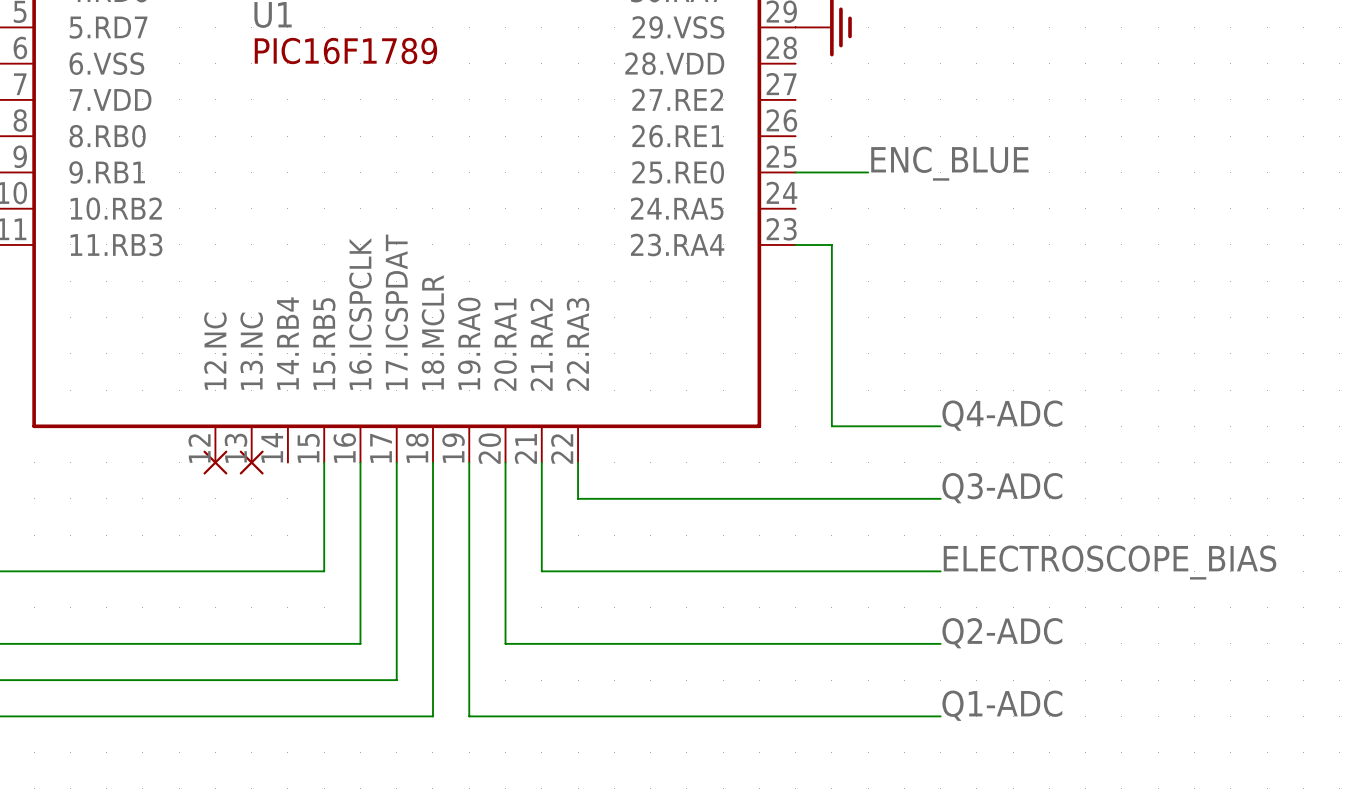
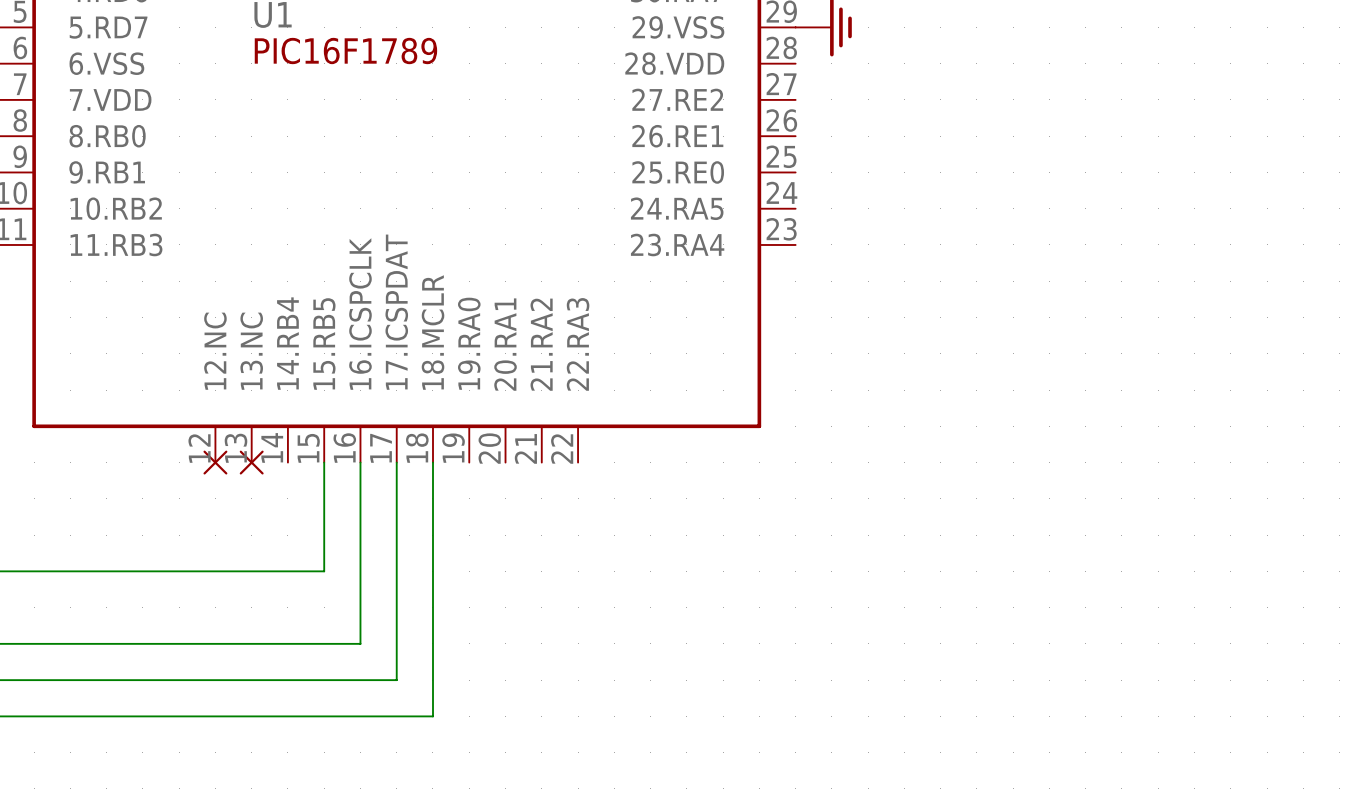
label: ENC_BLUE (949, 163) -> none
wire: (795, 172) (868, 172) -> none
wire: (795, 244) (831, 244) (831, 426) (940, 426) -> none
label: Q4-ADC (1002, 415) -> none
wire: (469, 462) (469, 716) (940, 716) -> none
wire: (505, 462) (505, 643) (940, 643) -> none
wire: (541, 462) (541, 571) (940, 571) -> none
wire: (578, 462) (578, 498) (940, 498) -> none
label: Q3-ADC (1002, 488) -> none
label: ELECTROSCOPE_BIAS (1110, 562) -> none
label: Q2-ADC (1002, 633) -> none
label: Q1-ADC (1002, 705) -> none

